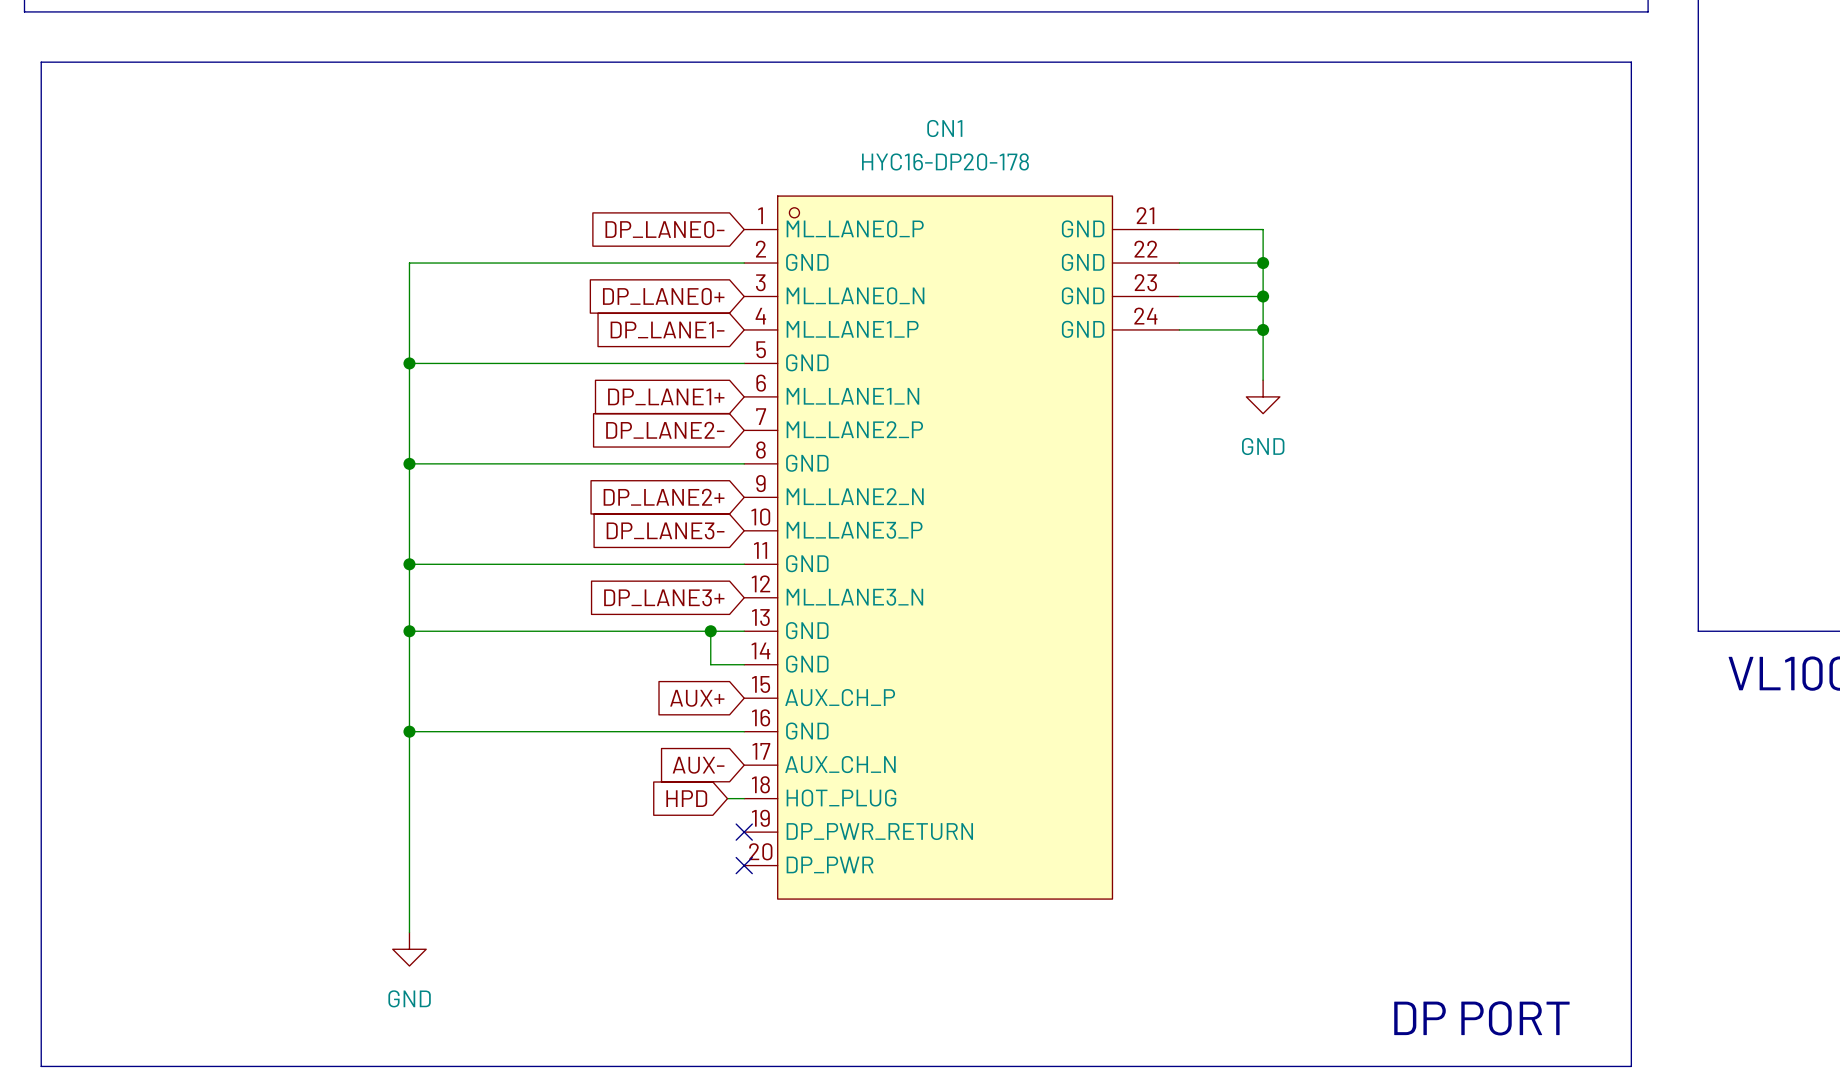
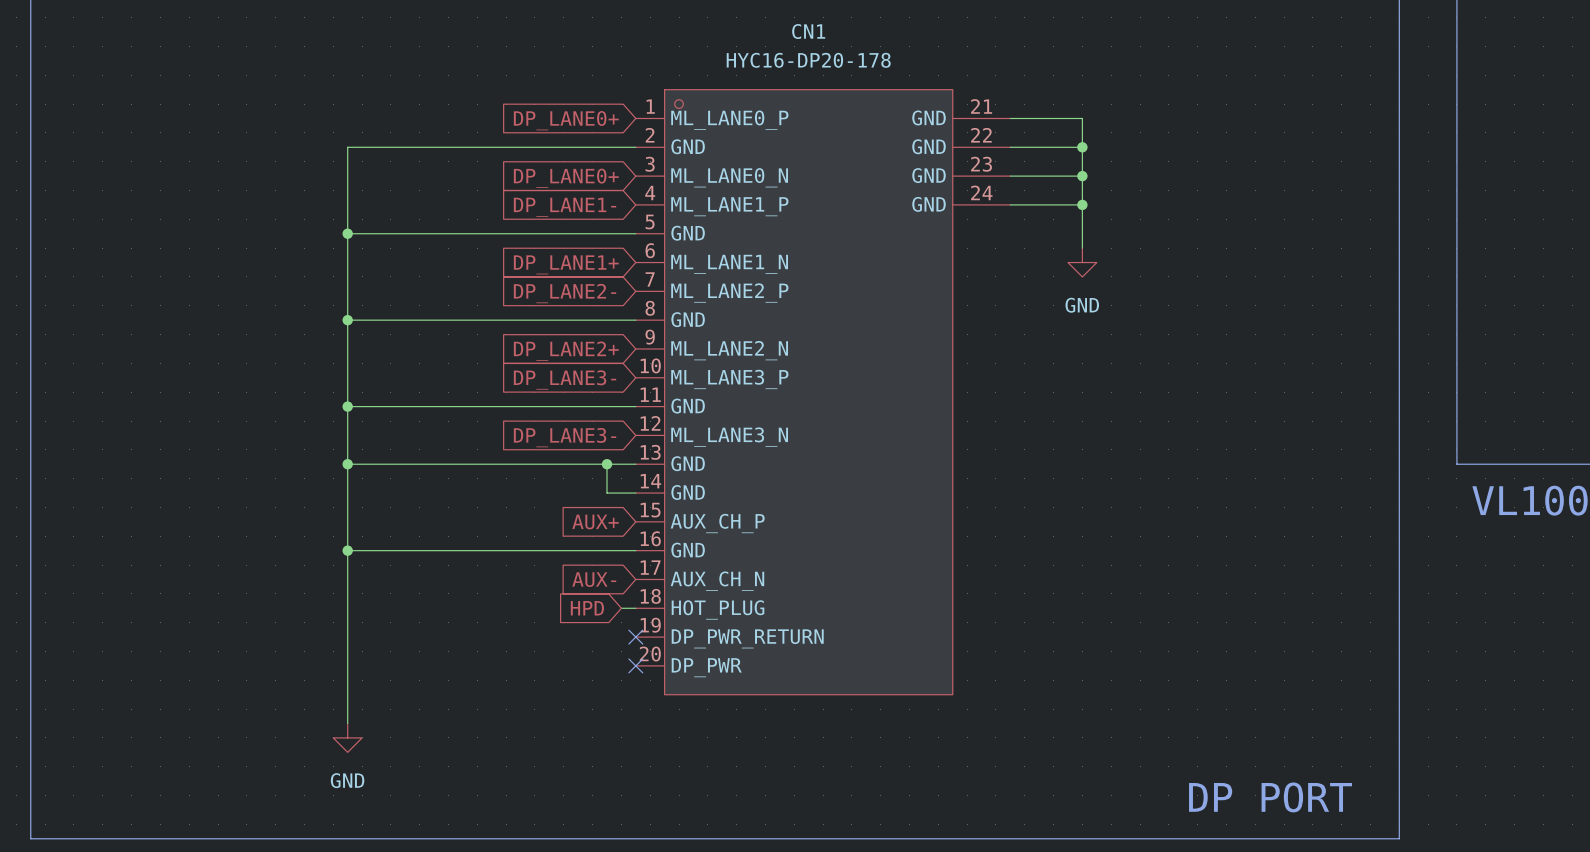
global label: DP_LANE0- (664, 229) -> DP_LANE0+ (566, 120)
global label: DP_LANE3+ (664, 597) -> DP_LANE3- (565, 437)

